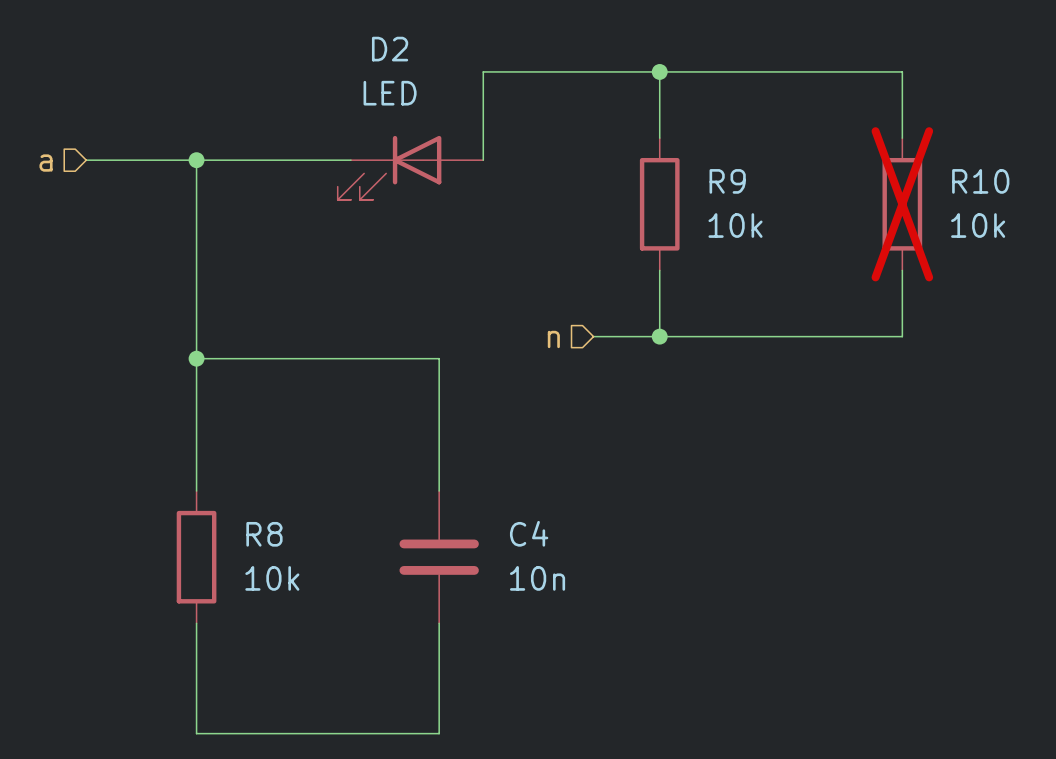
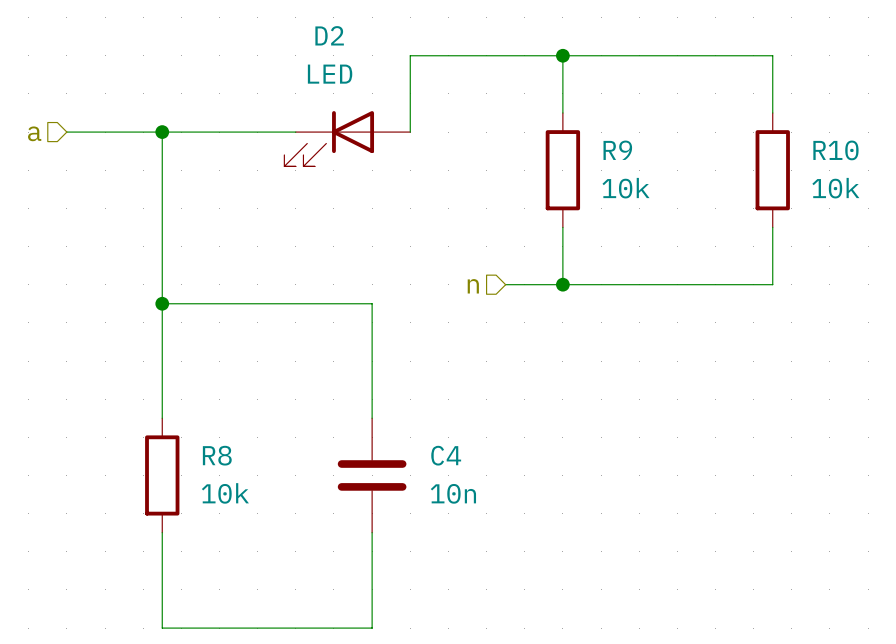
R10 do-not-place cross: (902, 204) -> none

